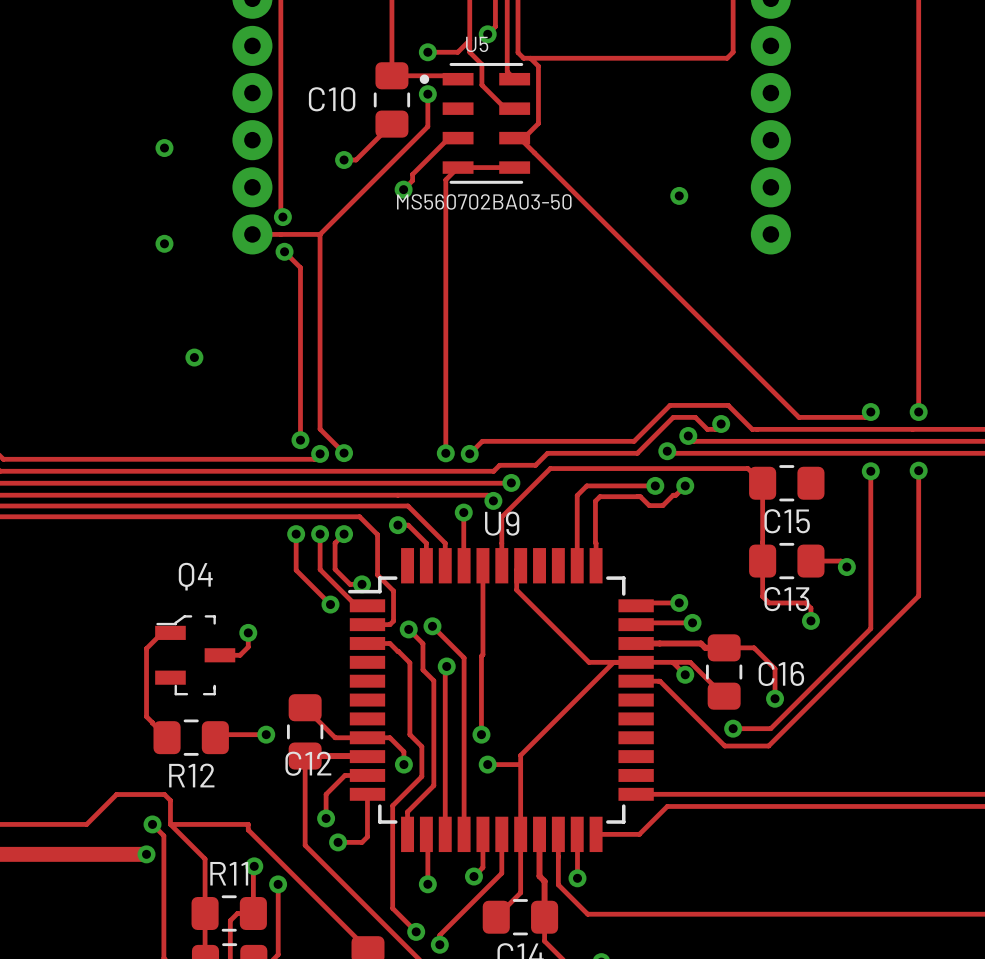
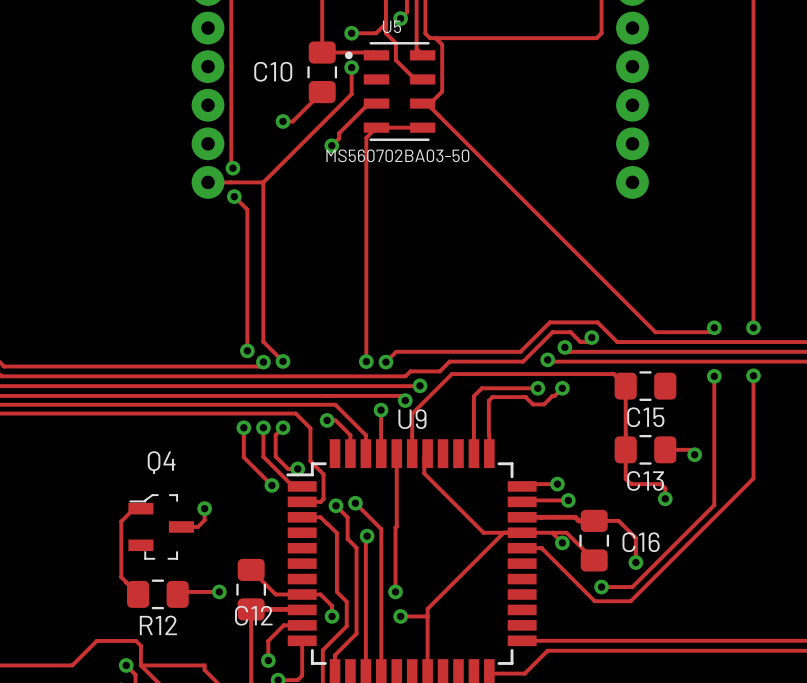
via: (164, 148) -> none
via: (679, 195) -> none
via: (164, 243) -> none
via: (194, 357) -> none

